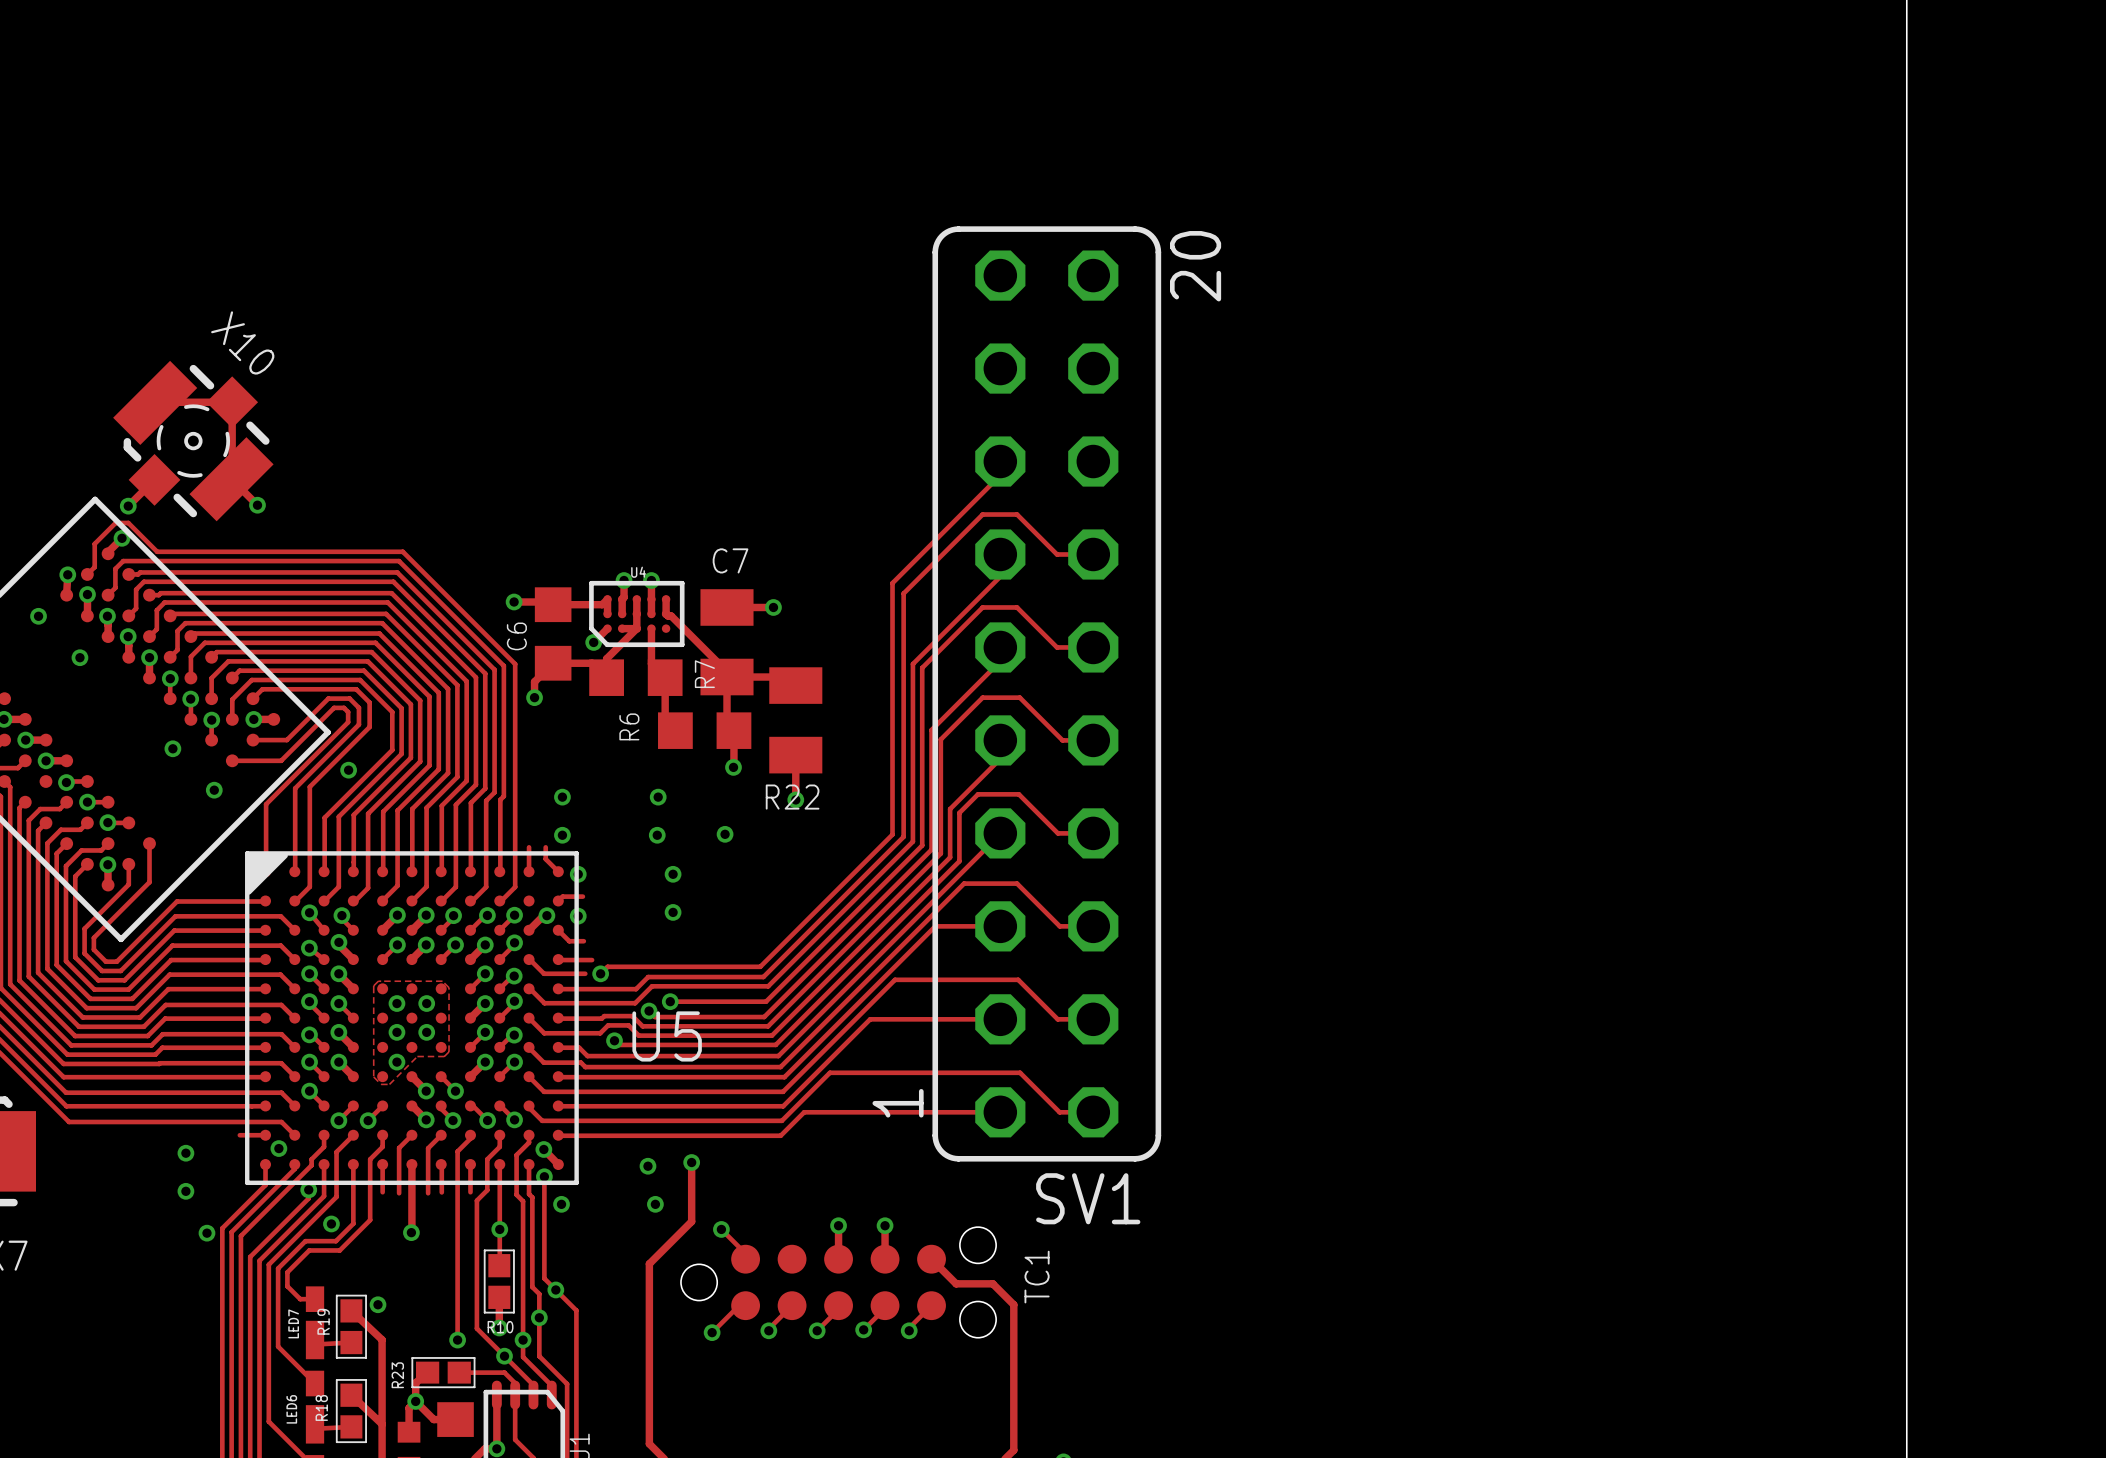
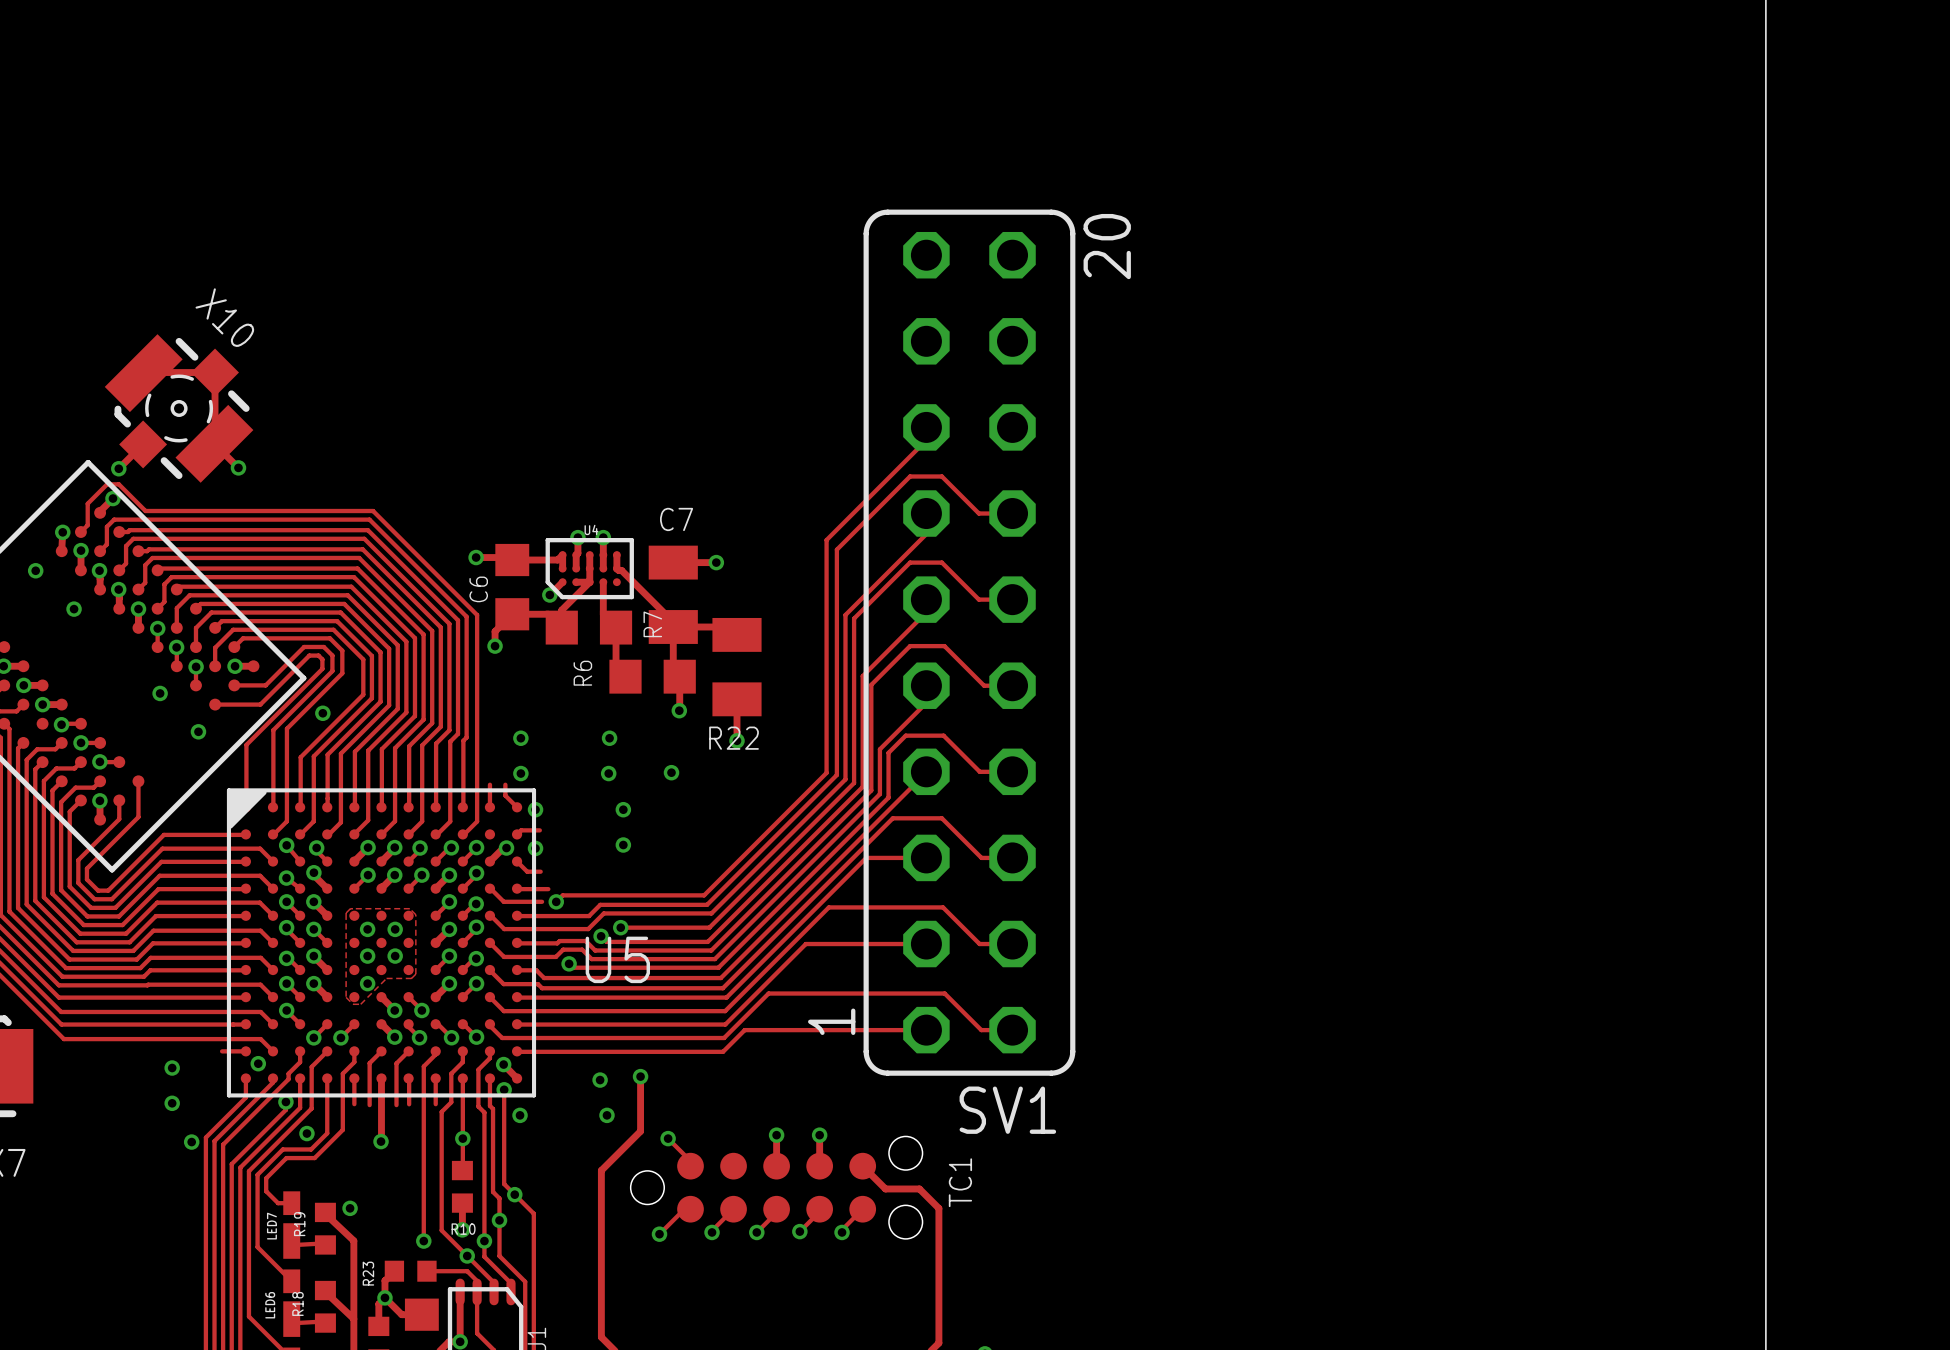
R10 footprint: [483, 1249, 515, 1314] -> [451, 1160, 473, 1213]
R19 footprint: [335, 1294, 367, 1359] -> [314, 1202, 336, 1255]
R23 footprint: [411, 1357, 476, 1389] -> [384, 1260, 437, 1282]
R18 footprint: [335, 1379, 367, 1444] -> [314, 1280, 336, 1333]

